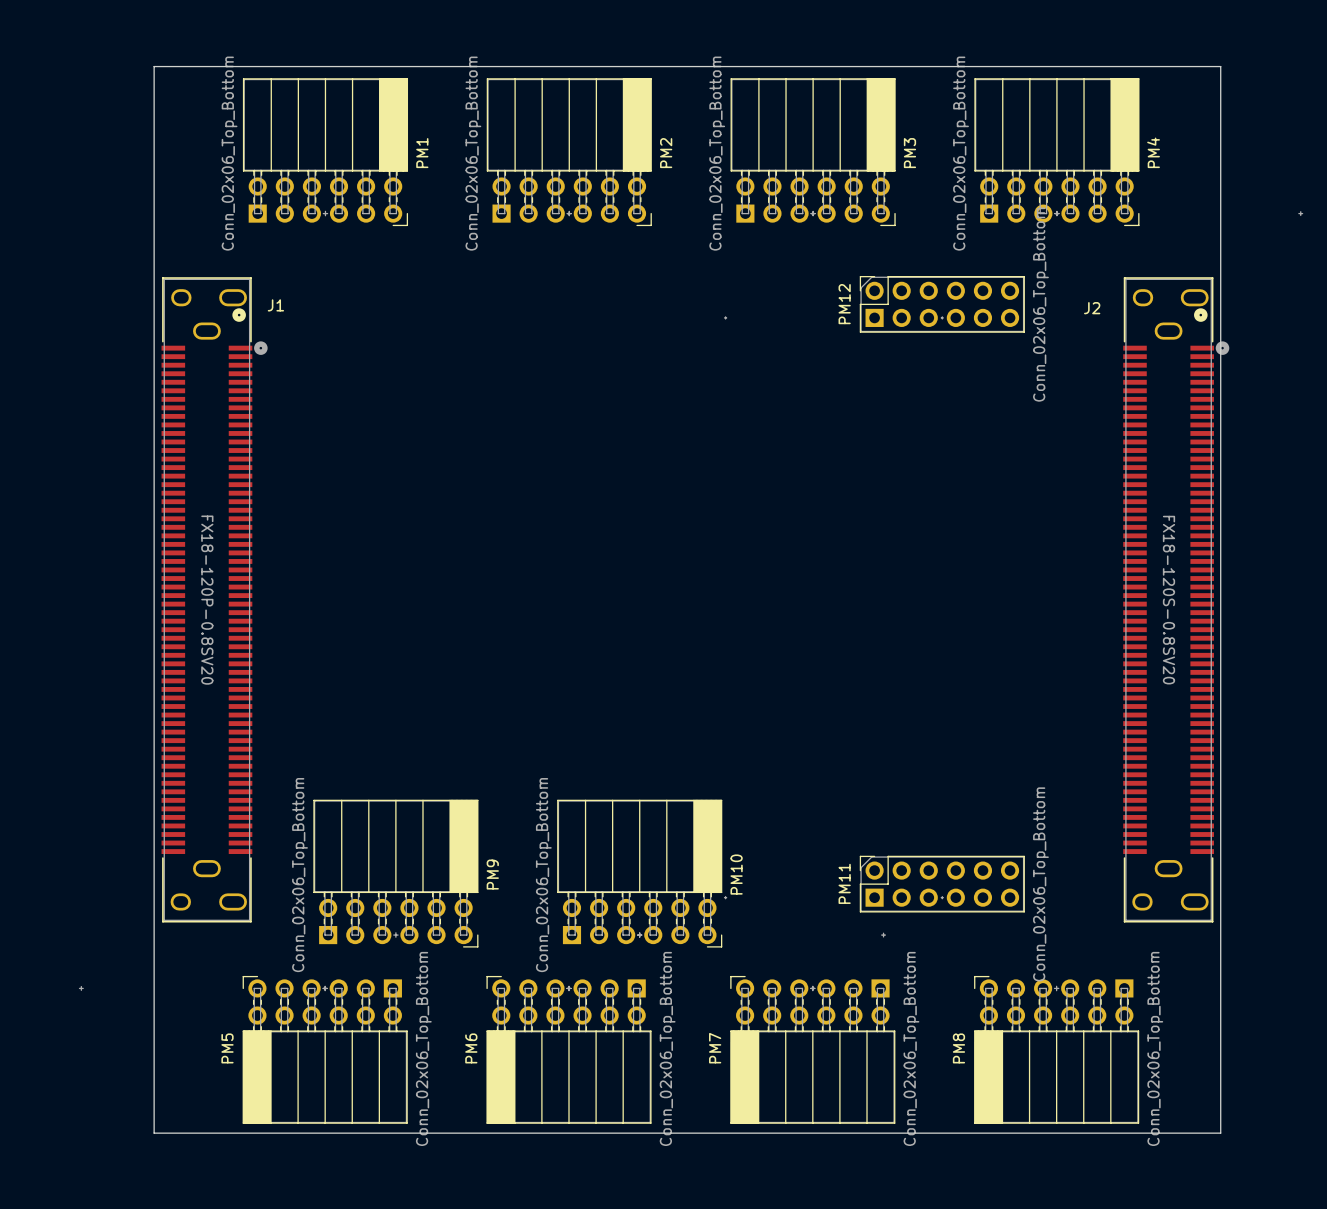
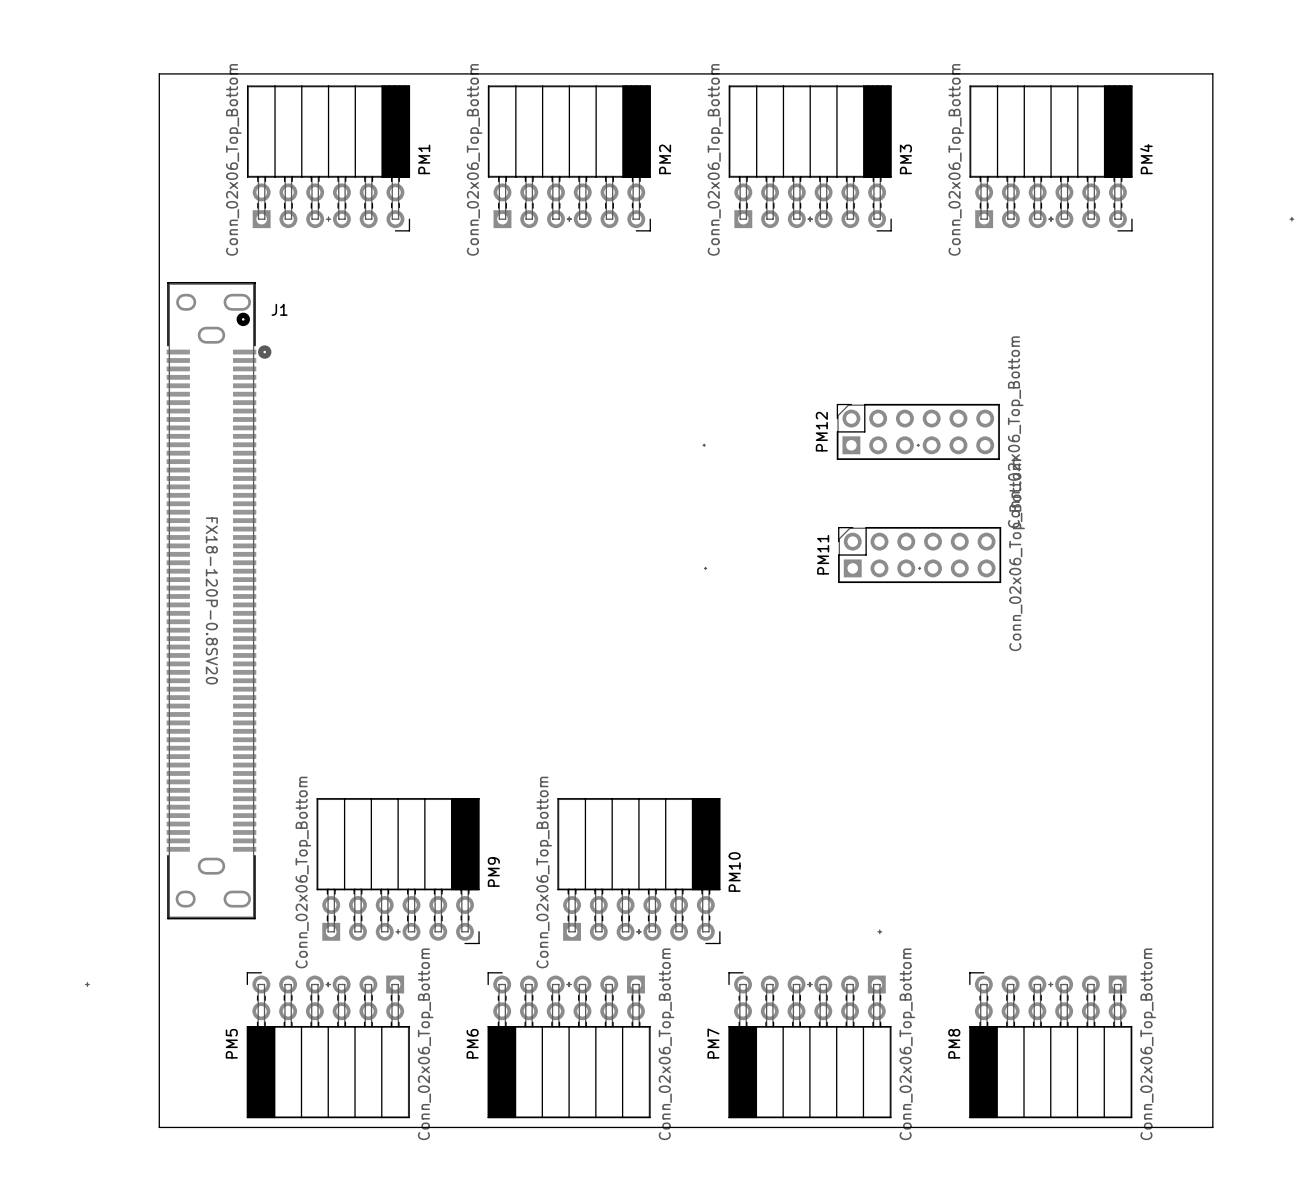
PM12 position: (874, 304) -> (851, 431)
J2: FX18-120S-0.8SV20 (1176, 599) -> none
PM11 position: (874, 884) -> (852, 555)

